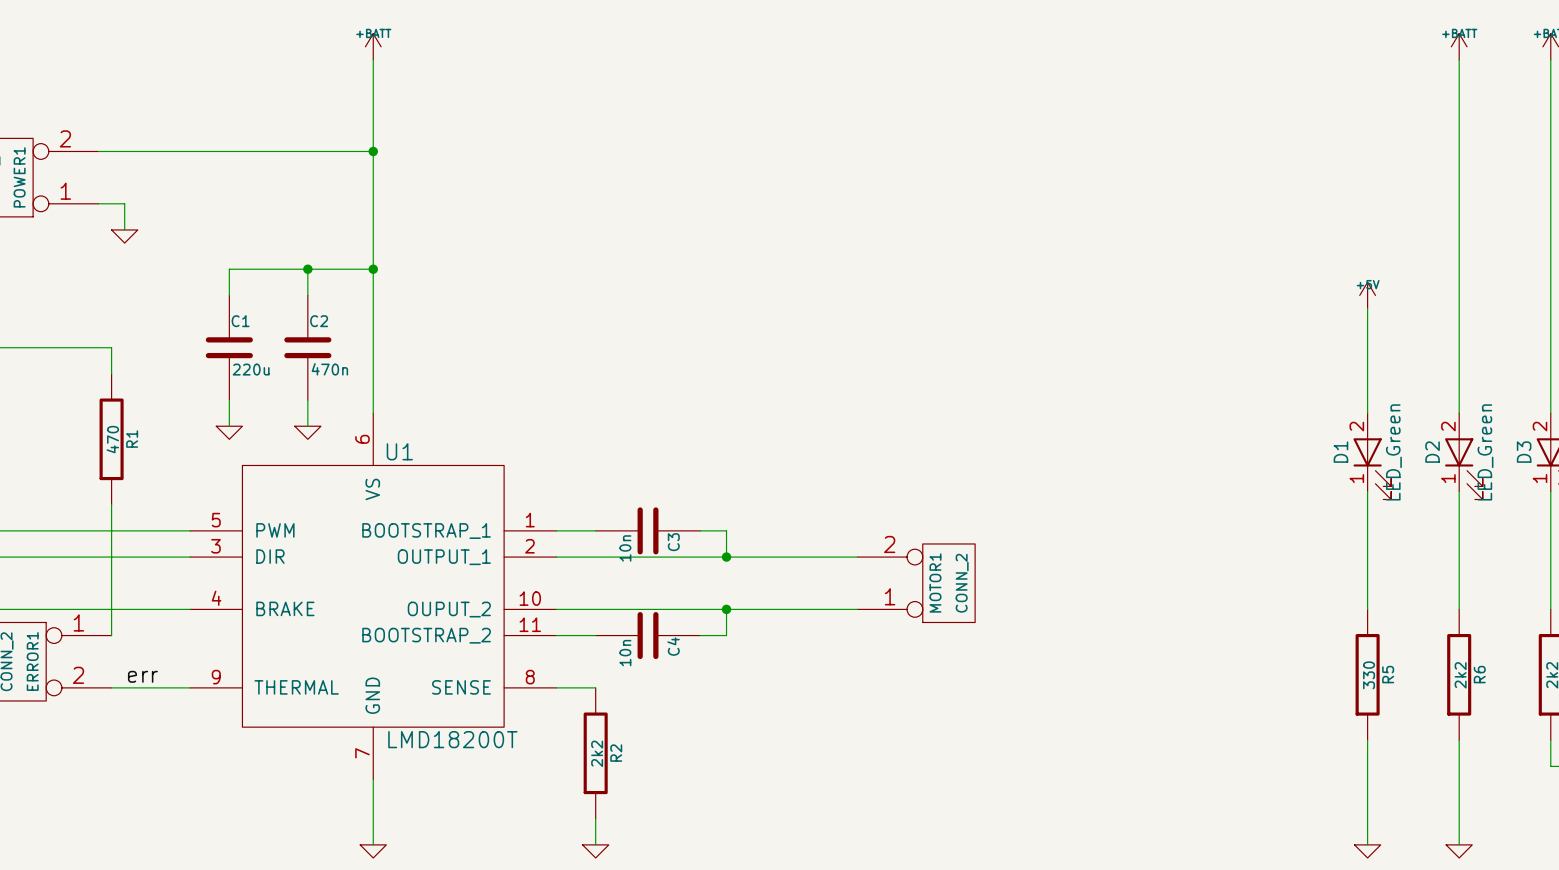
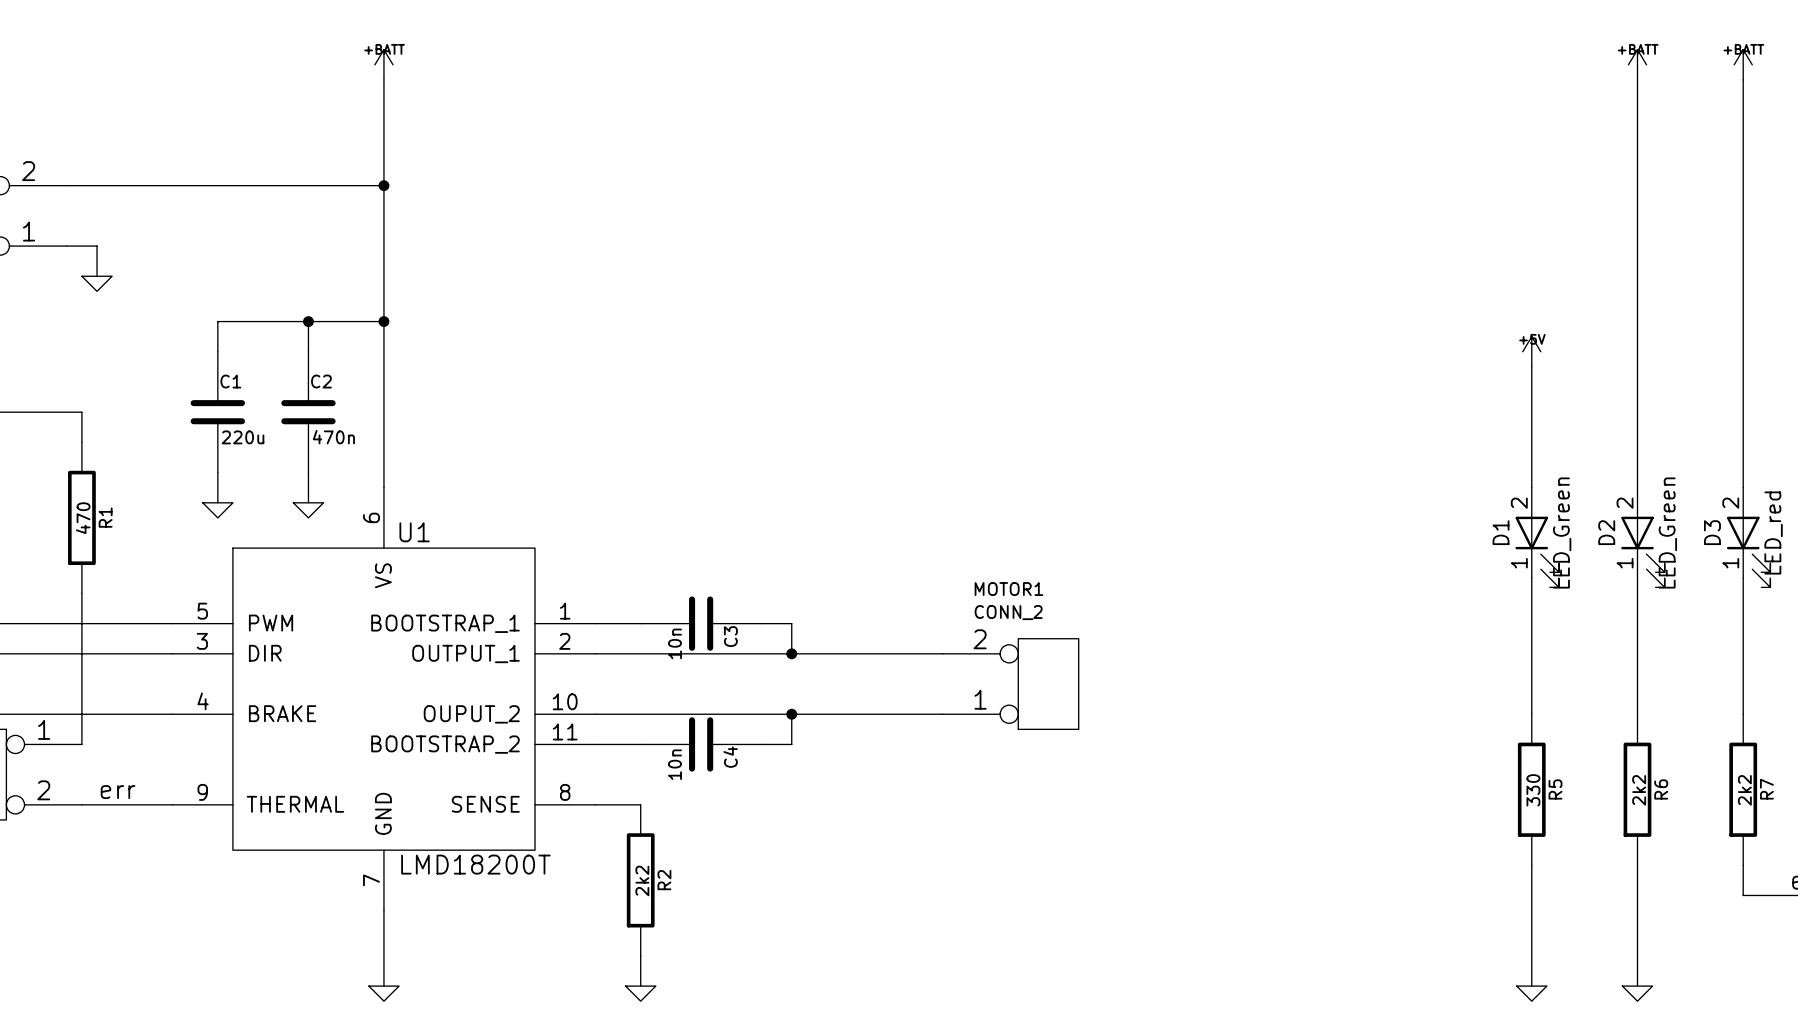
MOTOR1 name rotation: 0° (935, 582) -> 90° clockwise (1008, 589)
MOTOR1 name position: MOTOR1 (935, 582) -> MOTOR1 (1008, 589)
MOTOR1 value rotation: 0° (962, 583) -> 90° clockwise (1008, 612)
MOTOR1 value position: CONN_2 (962, 583) -> CONN_2 (1008, 612)

